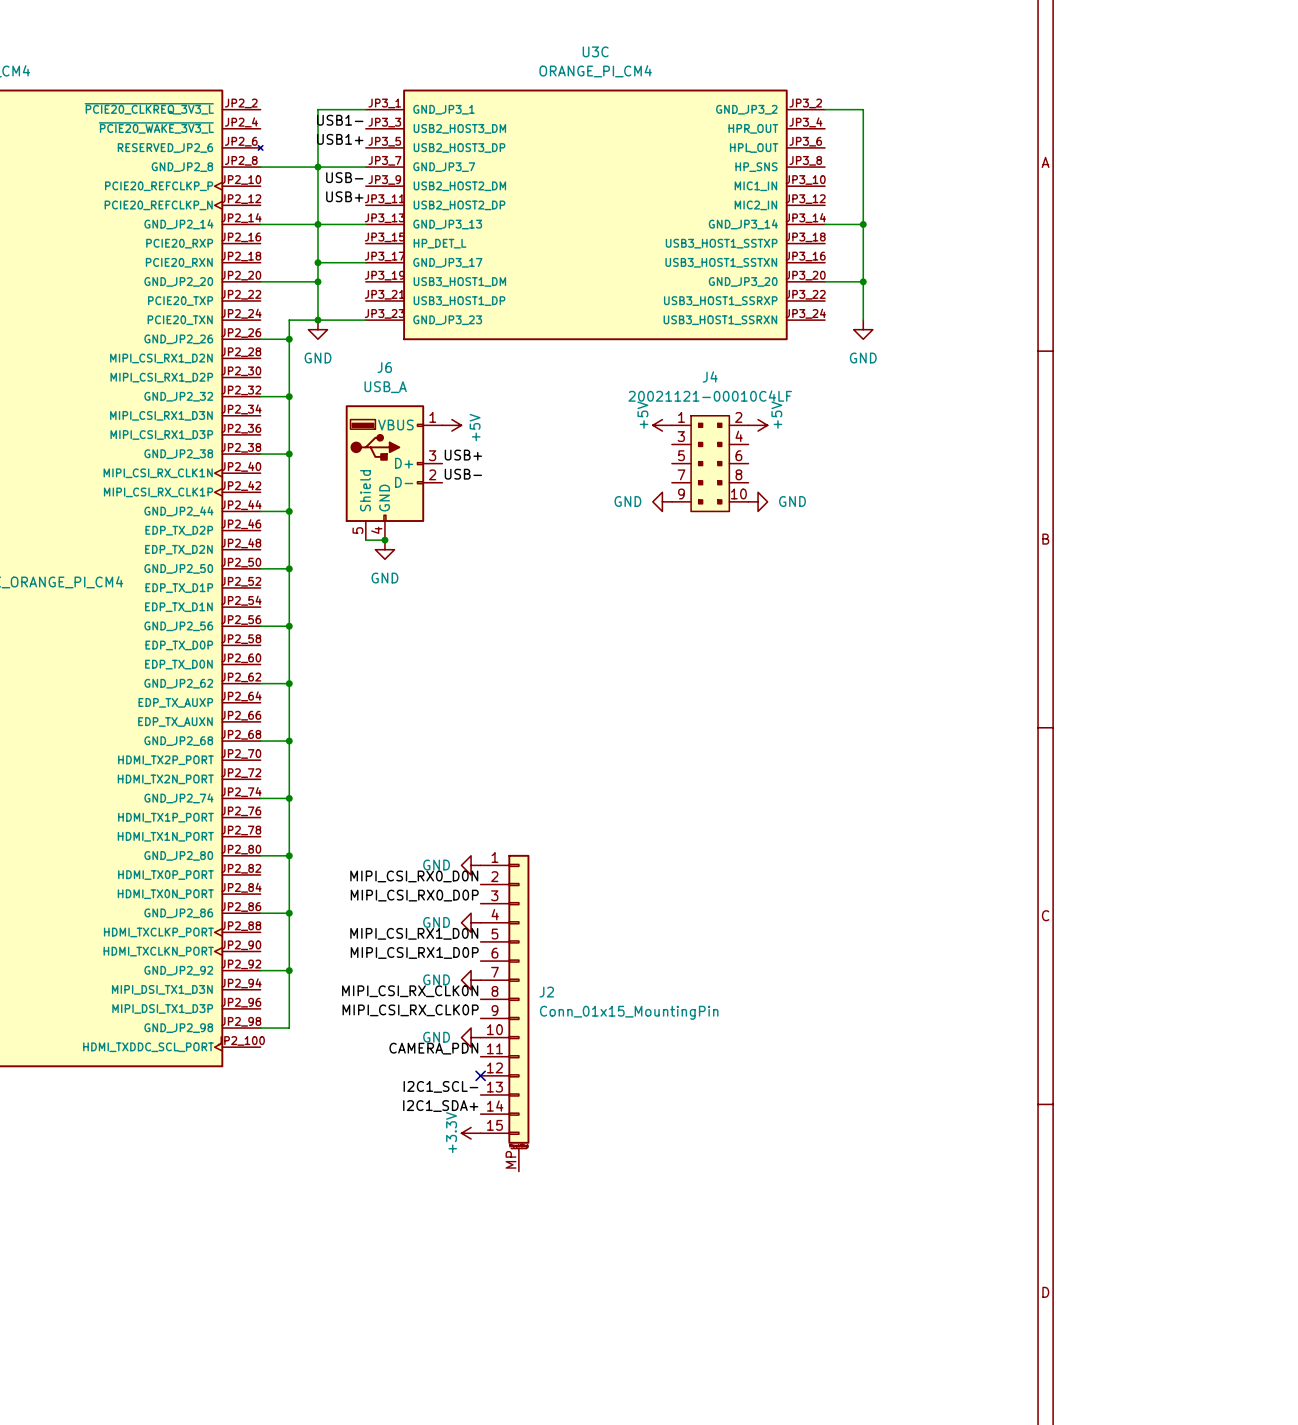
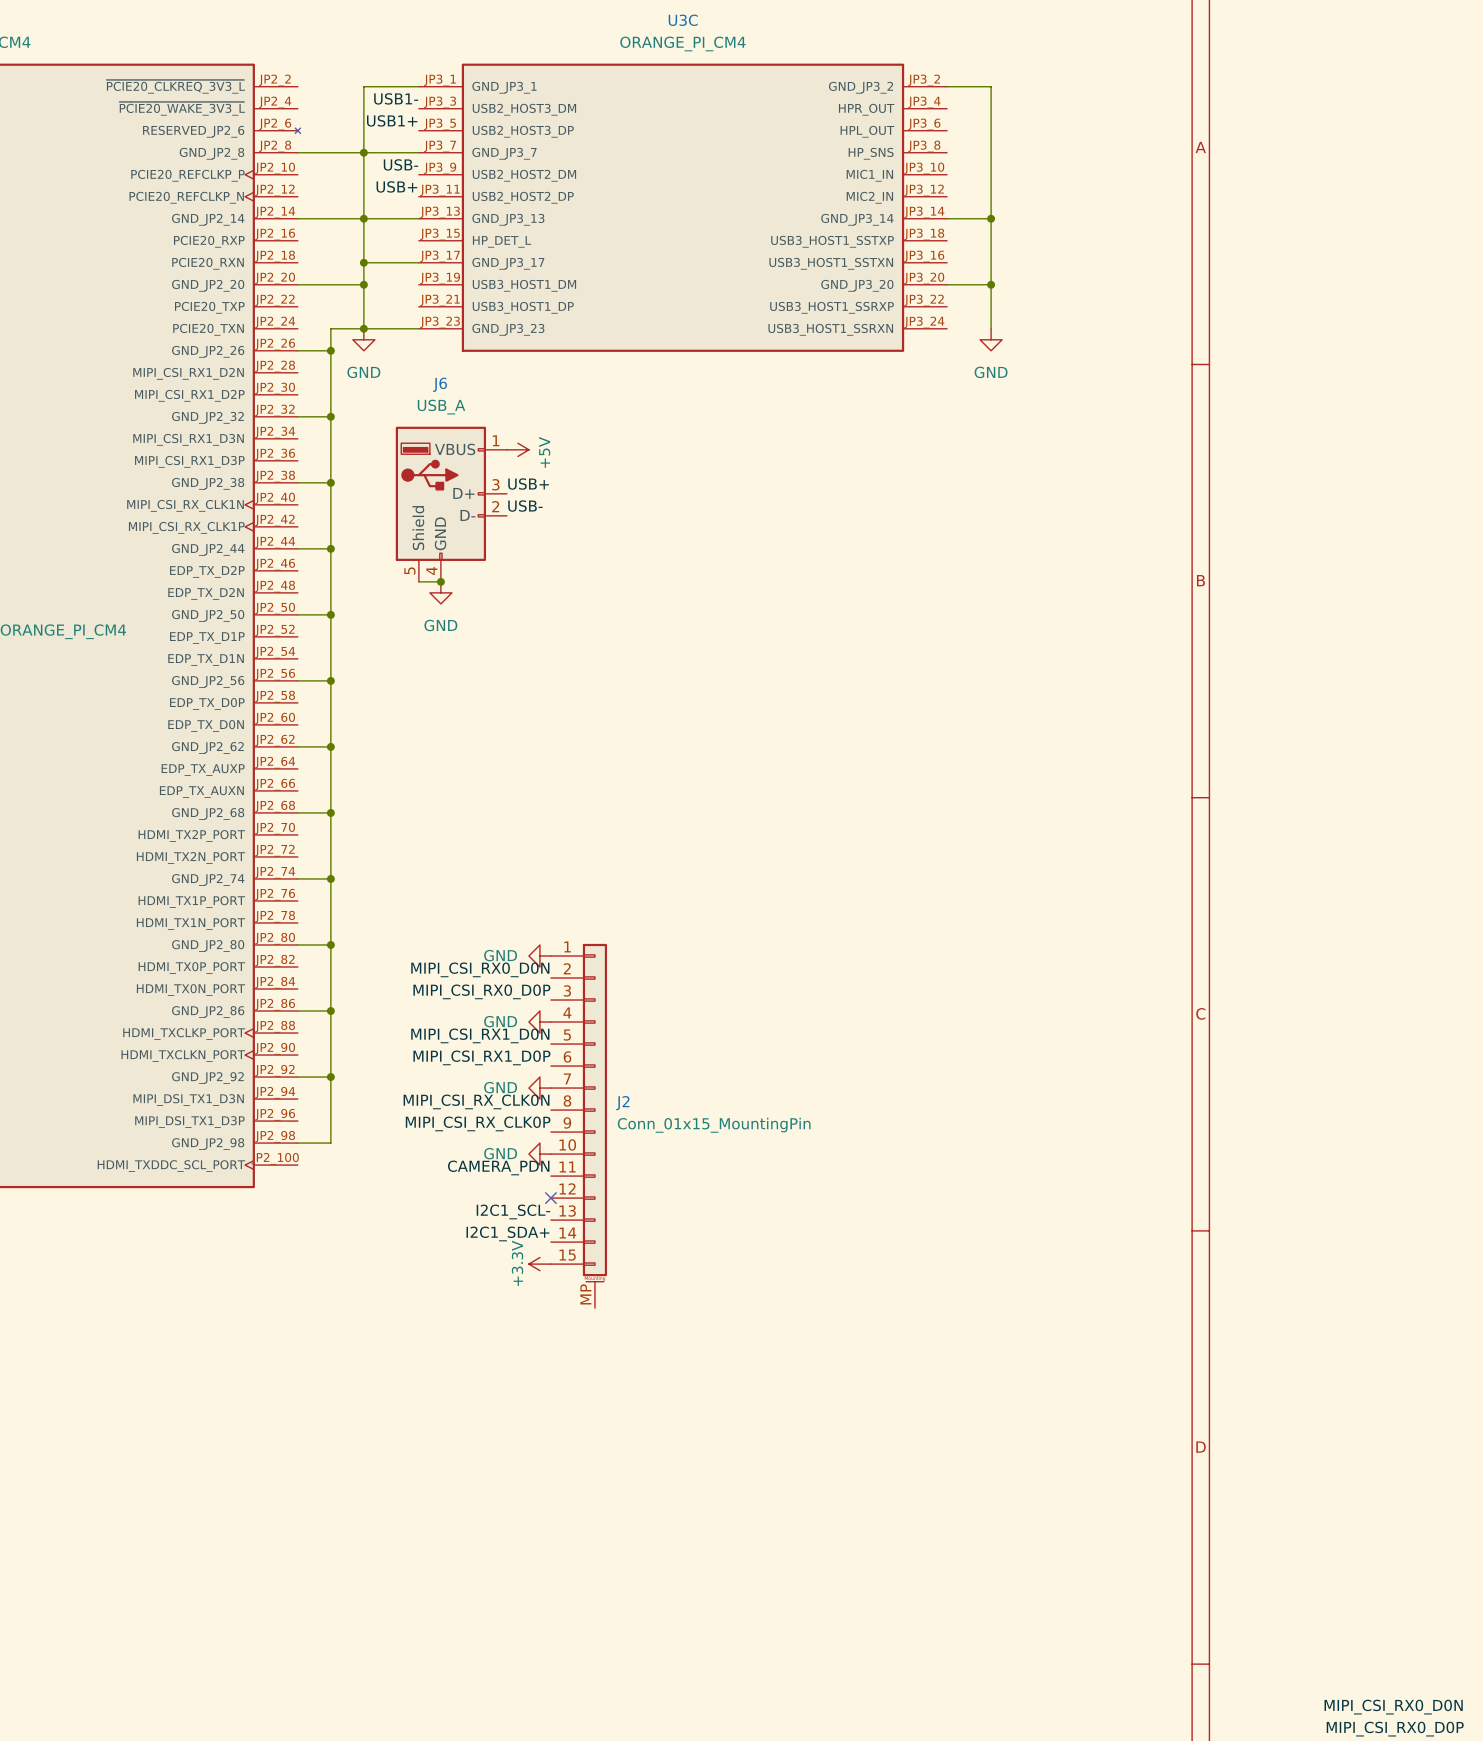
power symbol: +5V (662, 425) -> none
power symbol: +5V (758, 425) -> none
J4: 20021121-00010C4LF (710, 463) -> none
power symbol: GND (662, 501) -> none
power symbol: GND (758, 501) -> none

